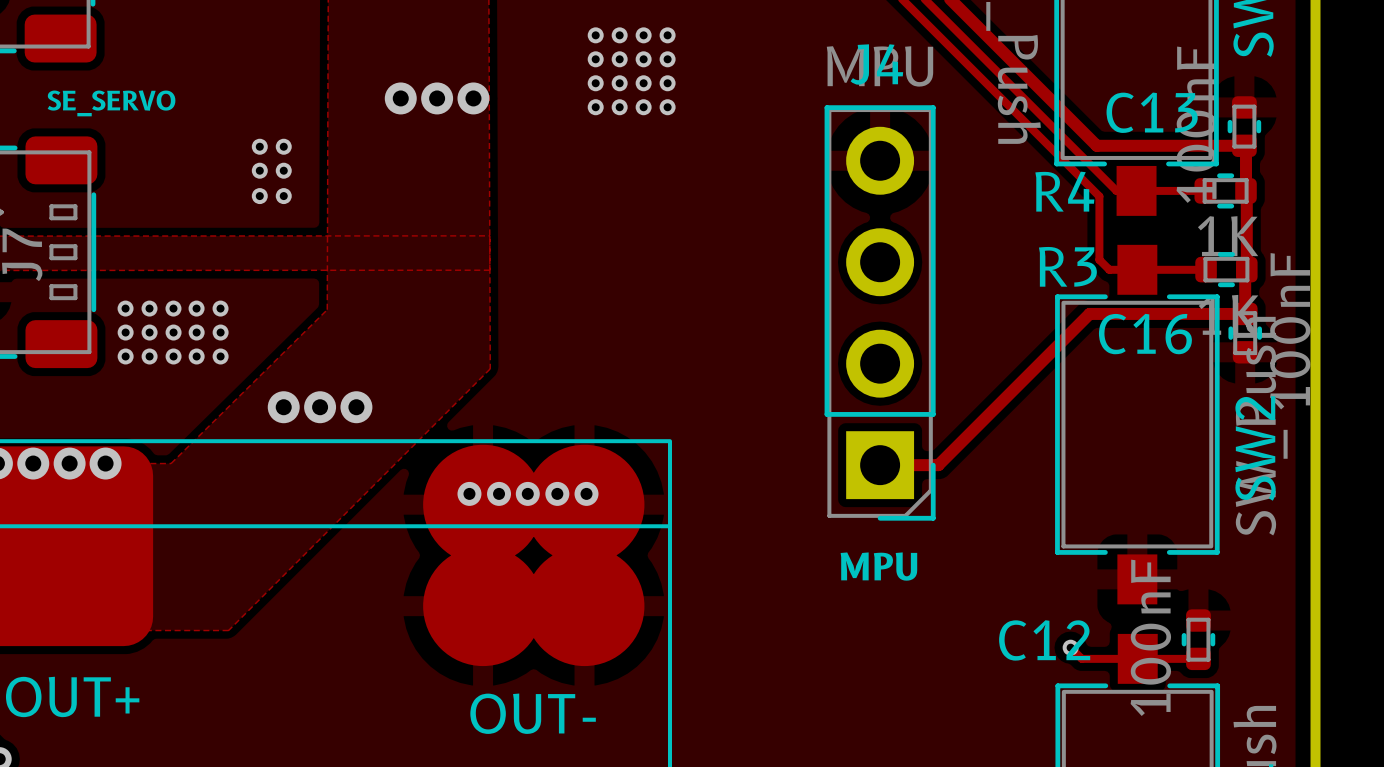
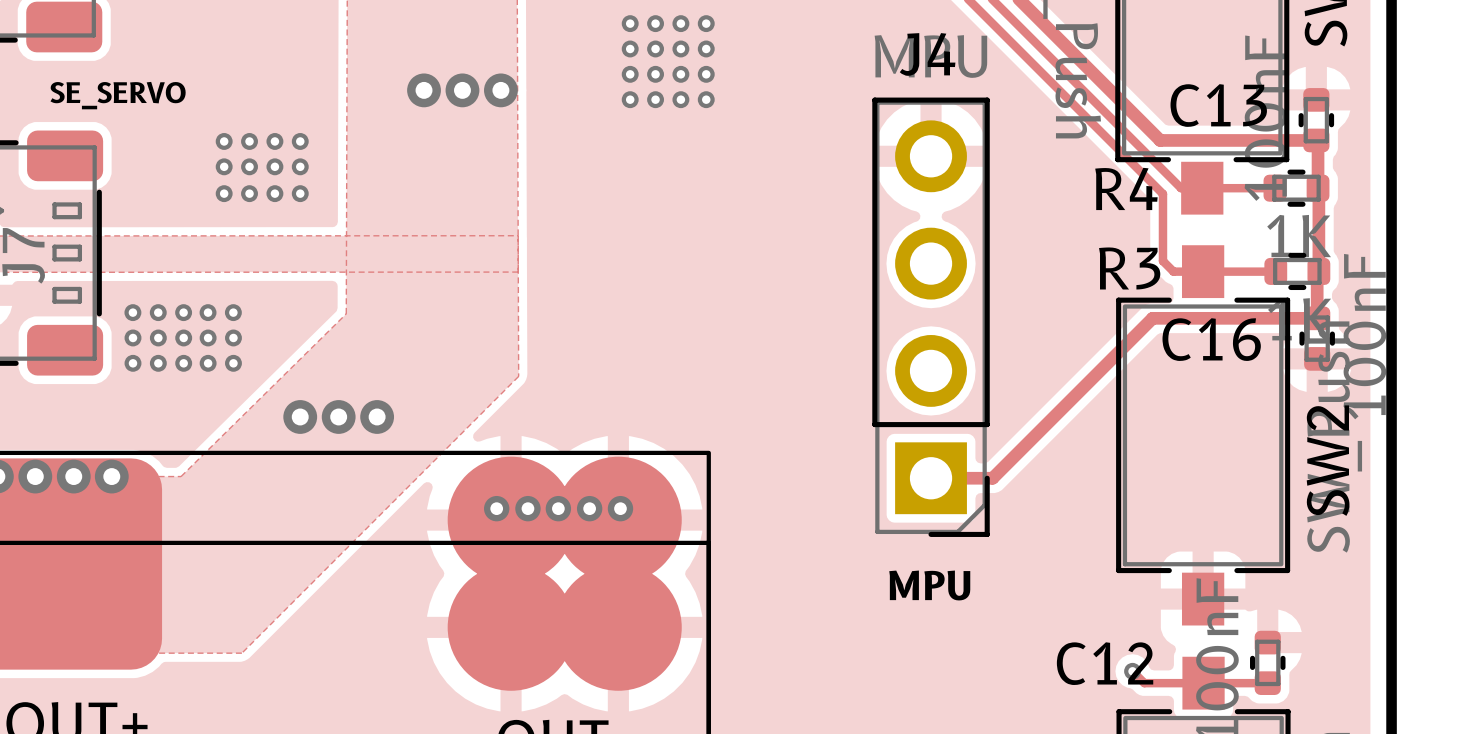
via: none -> (224, 141)
via: none -> (249, 141)
via: none -> (224, 166)
via: none -> (249, 166)
via: none -> (224, 193)
via: none -> (249, 193)

